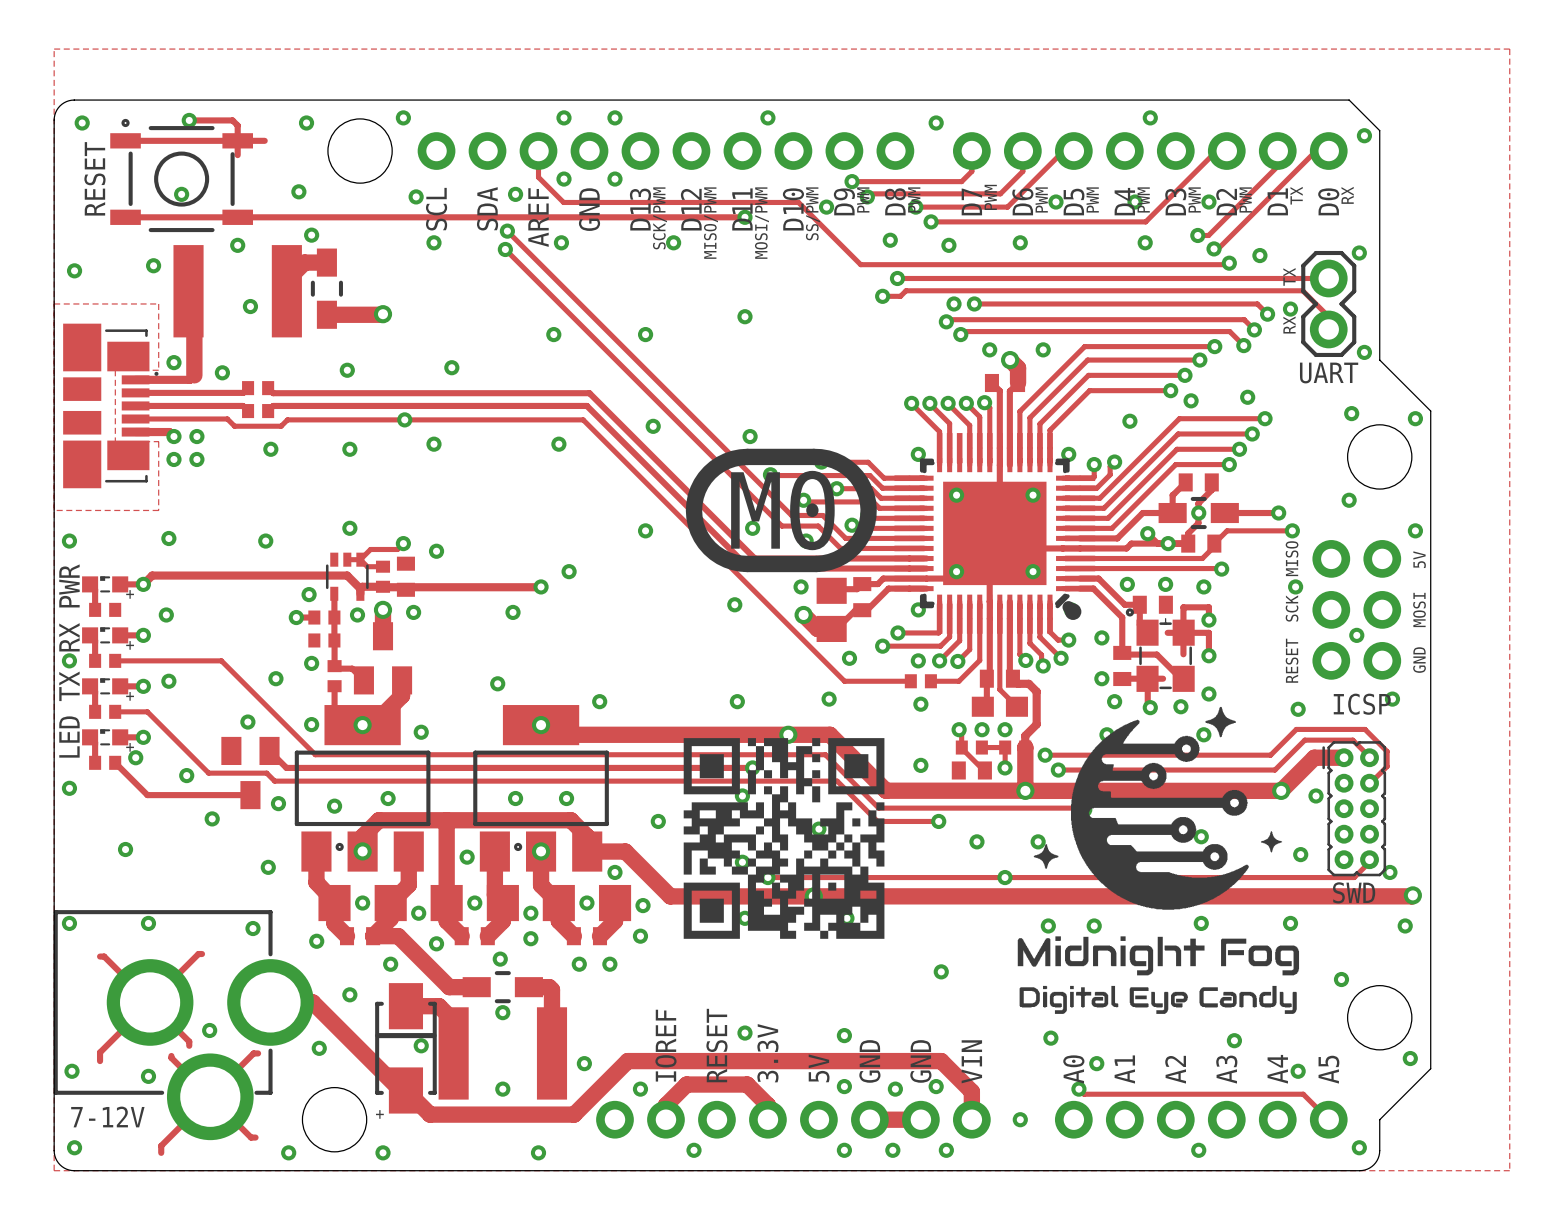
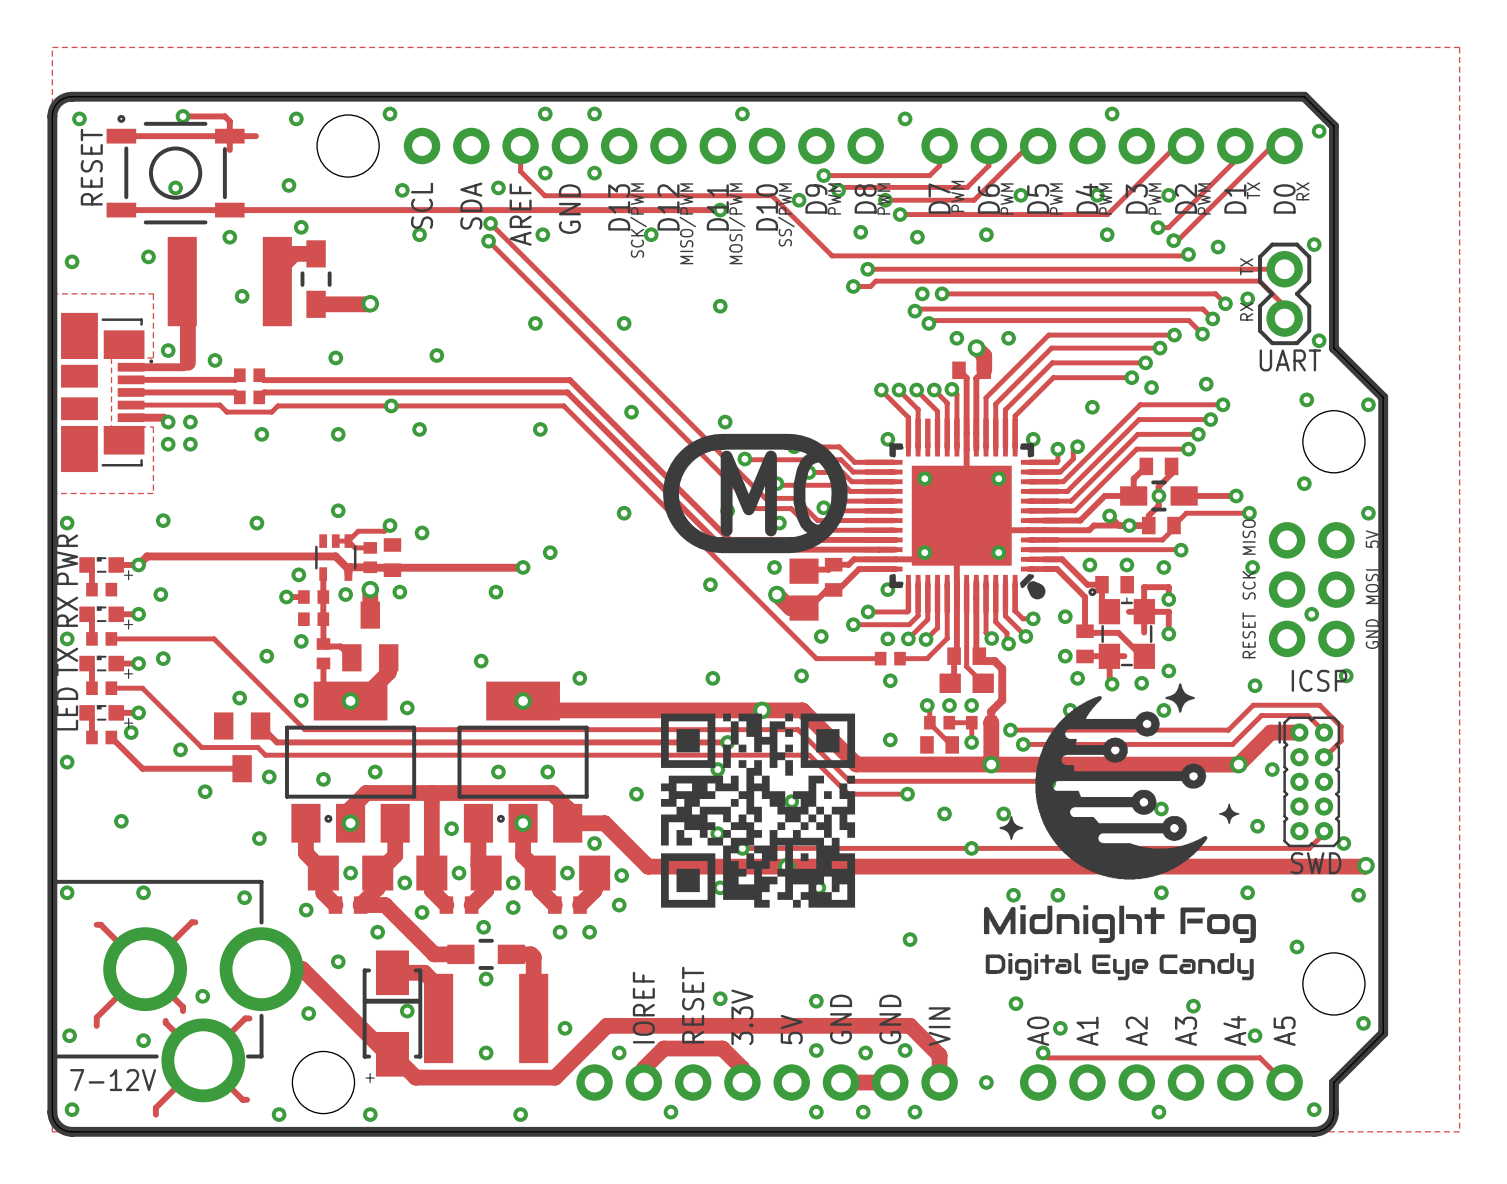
line: none -> (72, 96) (1304, 96) (1333, 126) (1333, 348) (1383, 397) (1383, 1033) (1333, 1082) (1333, 1114) (1329, 1124) (1321, 1130) (1314, 1131) (72, 1131) (60, 1127) (53, 1119) (52, 1112) (52, 116) (53, 108) (58, 102) (64, 98) (72, 96)

